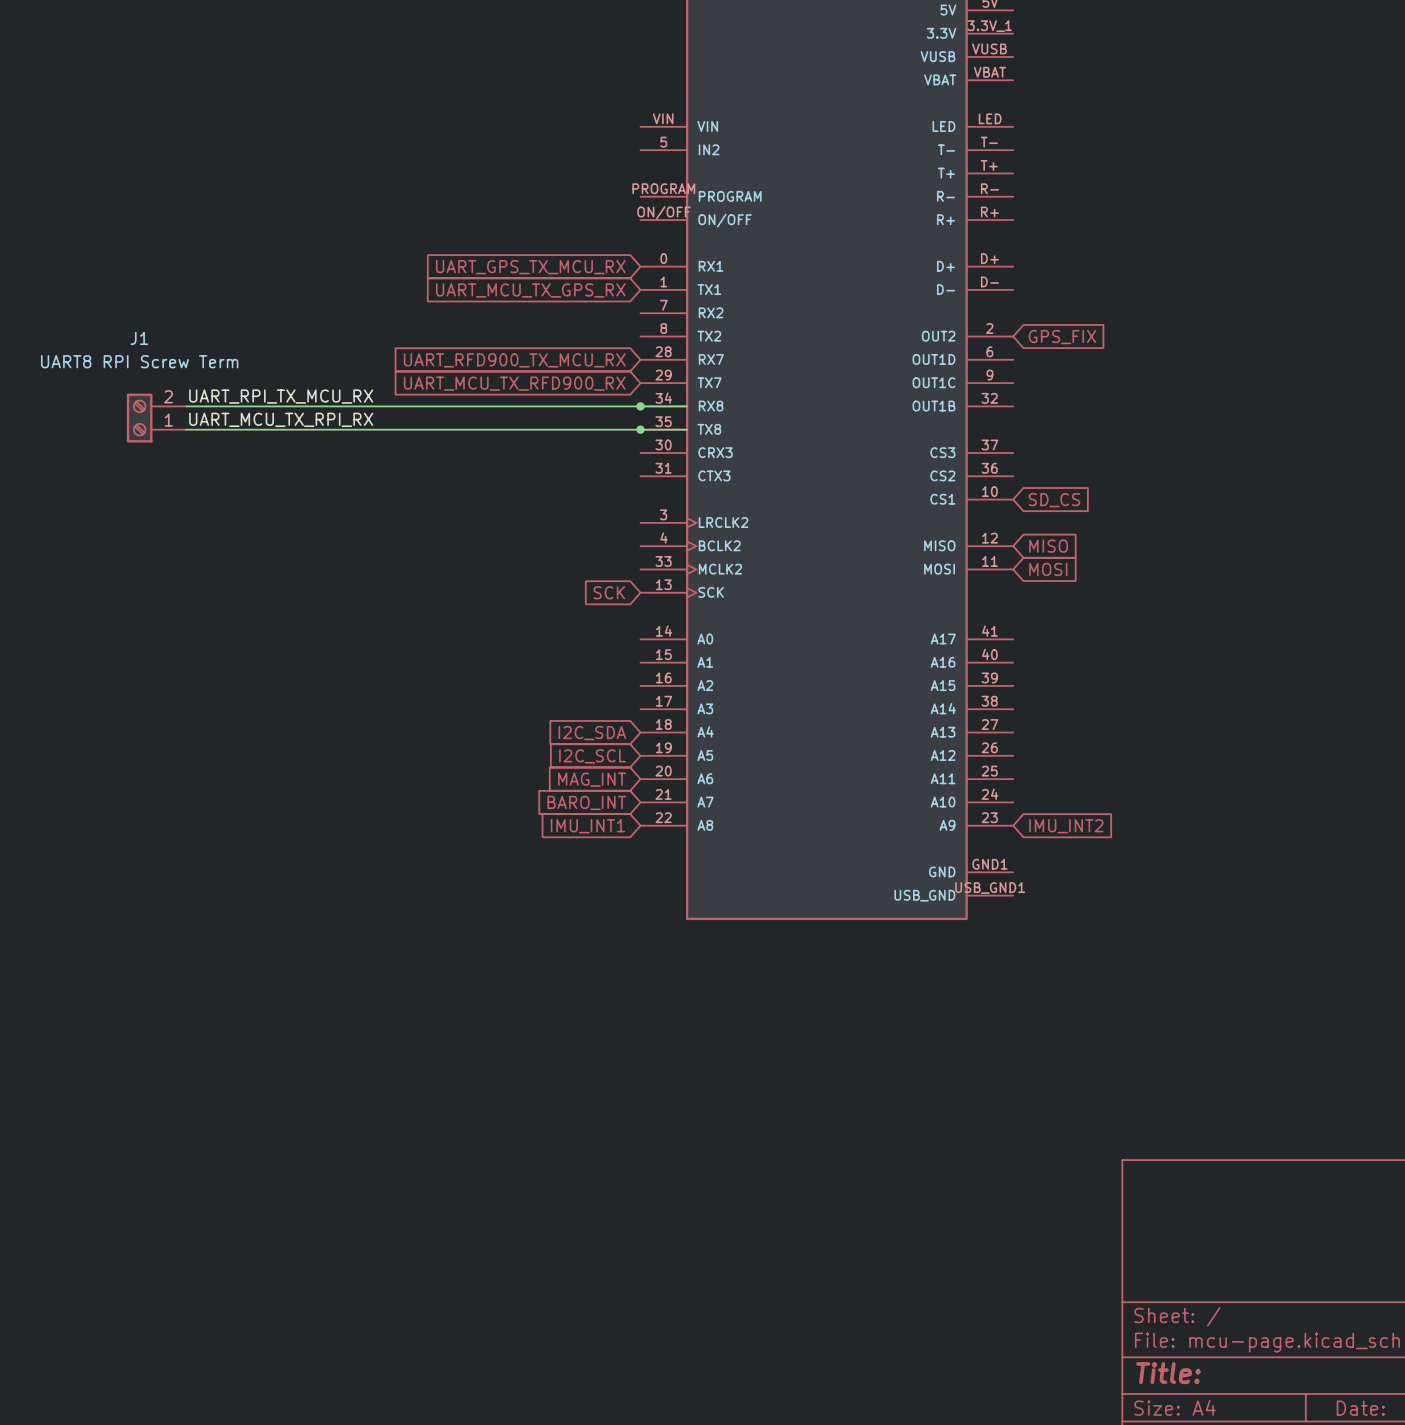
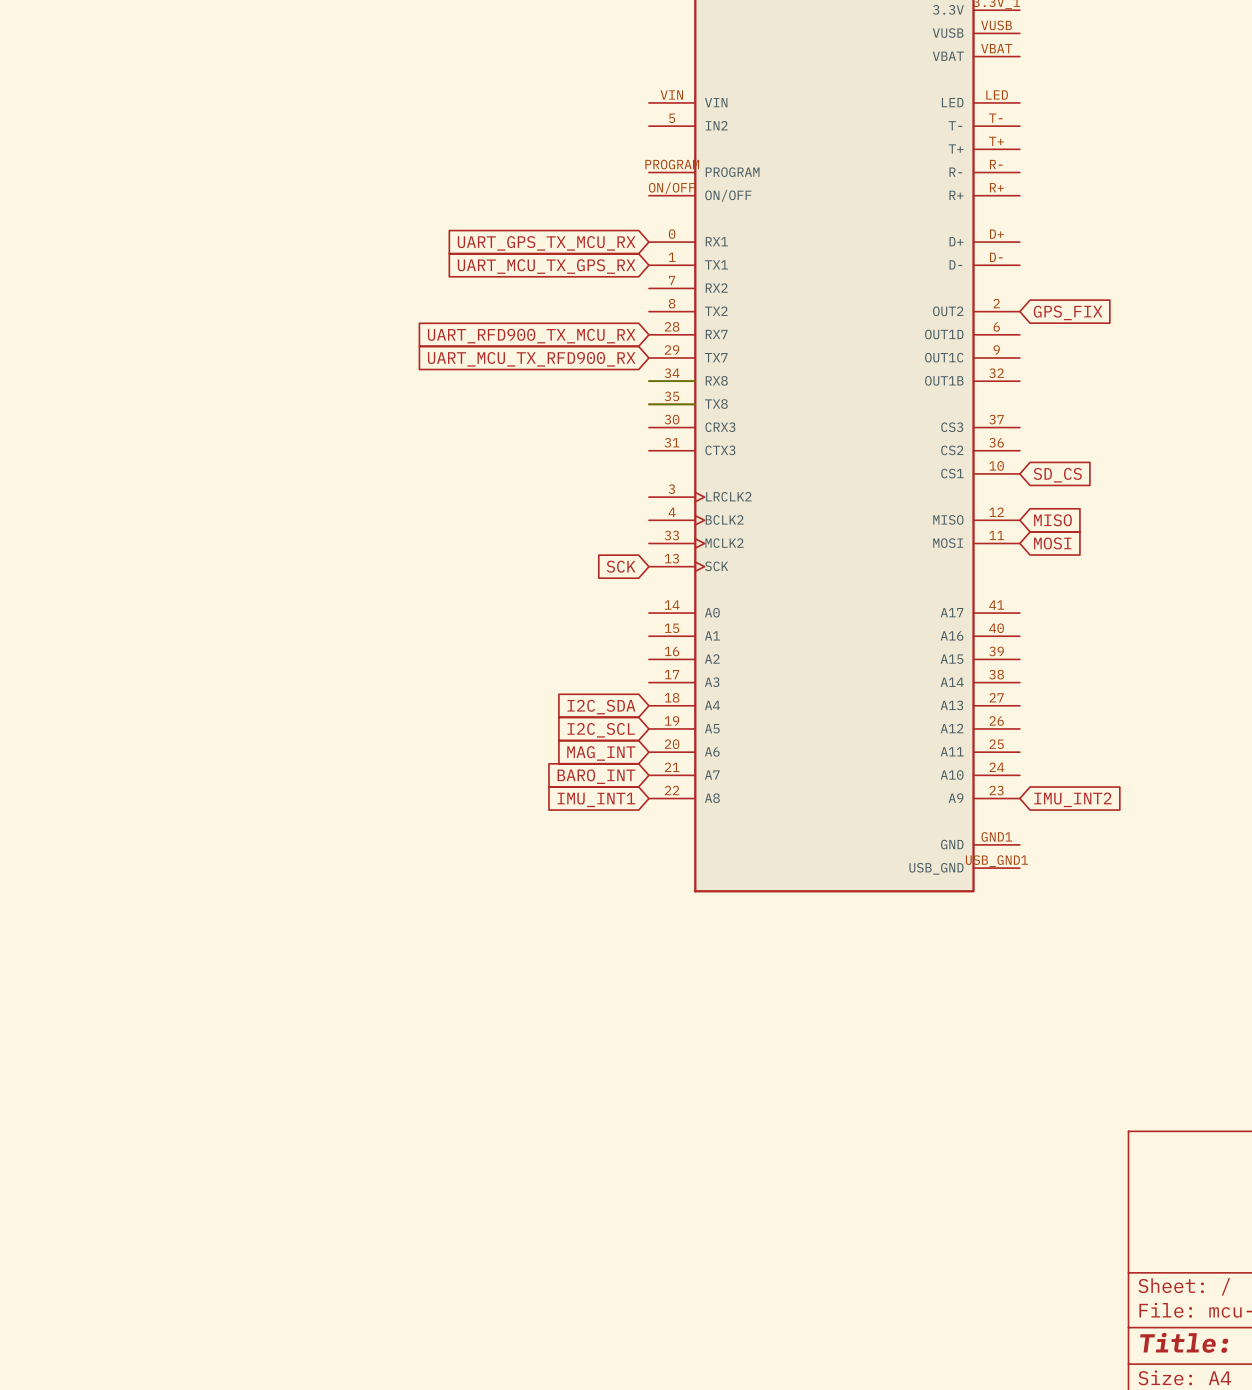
label: UART_RPI_TX_MCU_RX (281, 396) -> none
wire: (186, 406) (640, 406) -> none
junction: (640, 406) -> none
J1: UART8 RPI Screw Term (156, 418) -> none
label: UART_MCU_TX_RPI_RX (281, 419) -> none
wire: (186, 429) (640, 429) -> none
junction: (640, 429) -> none

